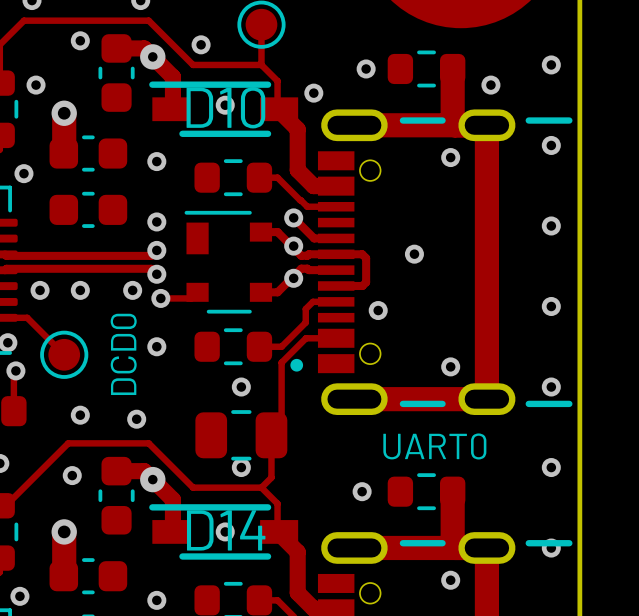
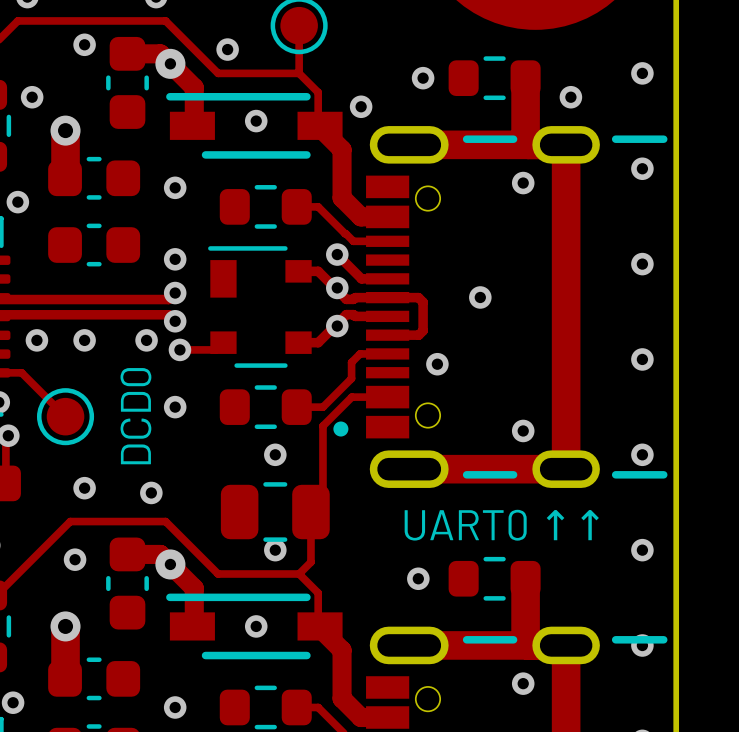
D10 name: D10 (225, 107) -> none
text: UART0 (434, 446) -> UART0 ↑↑ (501, 525)
D14 name: D14 (226, 530) -> none

